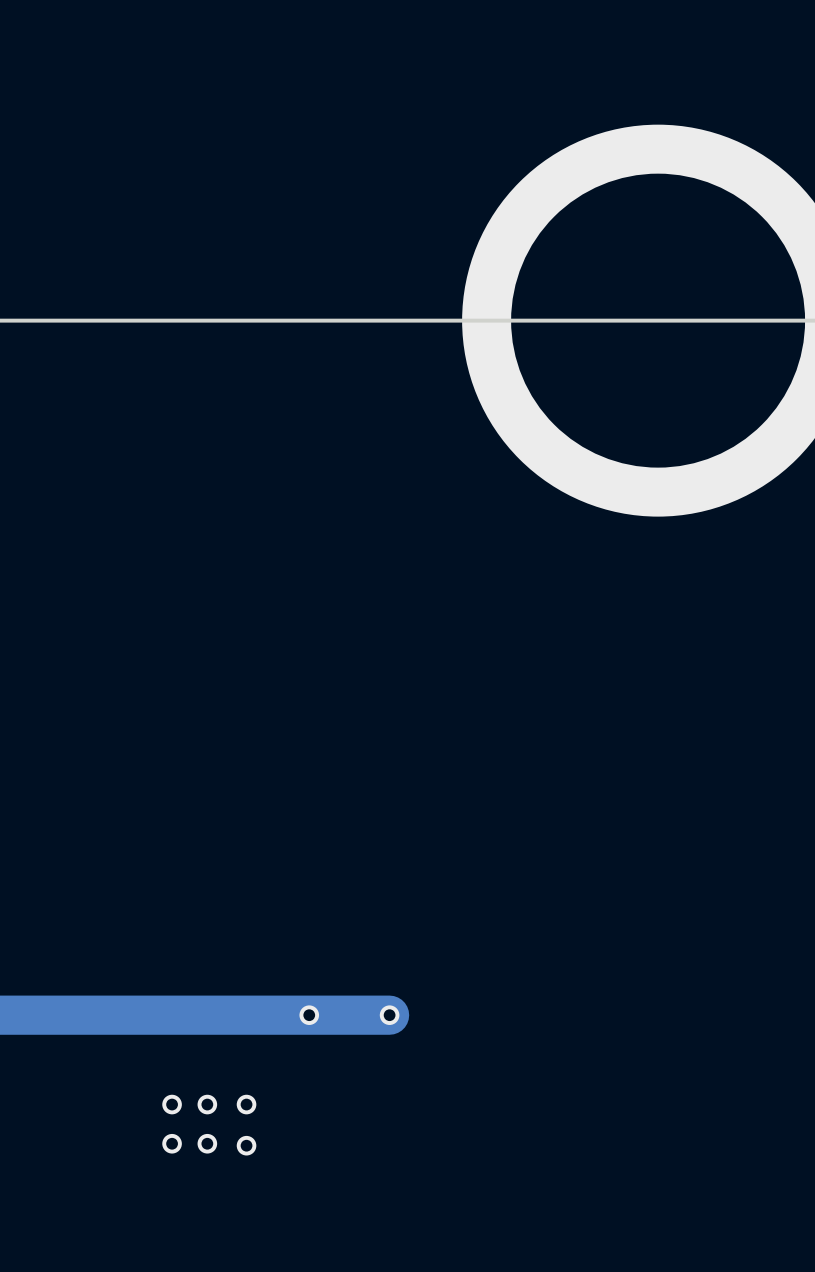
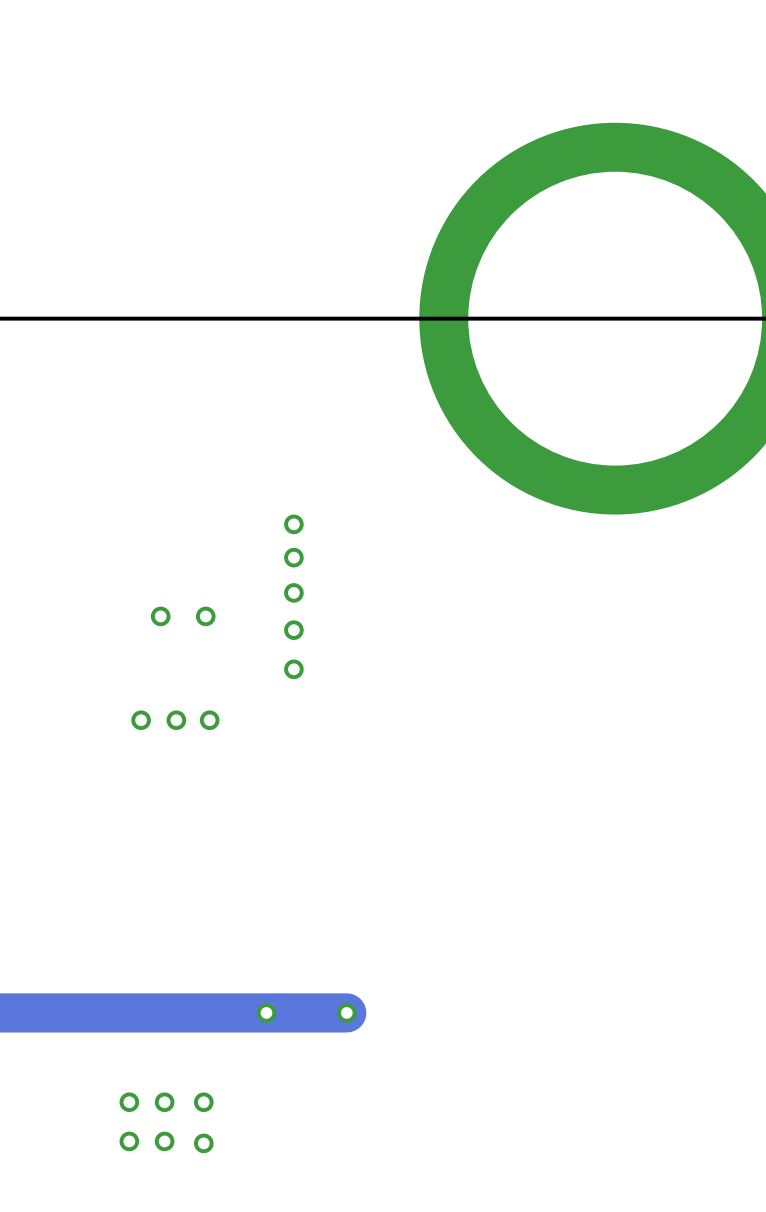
via: none -> (293, 524)
via: none -> (293, 557)
via: none -> (293, 592)
via: none -> (160, 616)
via: none -> (205, 616)
via: none -> (293, 630)
via: none -> (293, 669)
via: none -> (141, 720)
via: none -> (176, 720)
via: none -> (209, 720)

